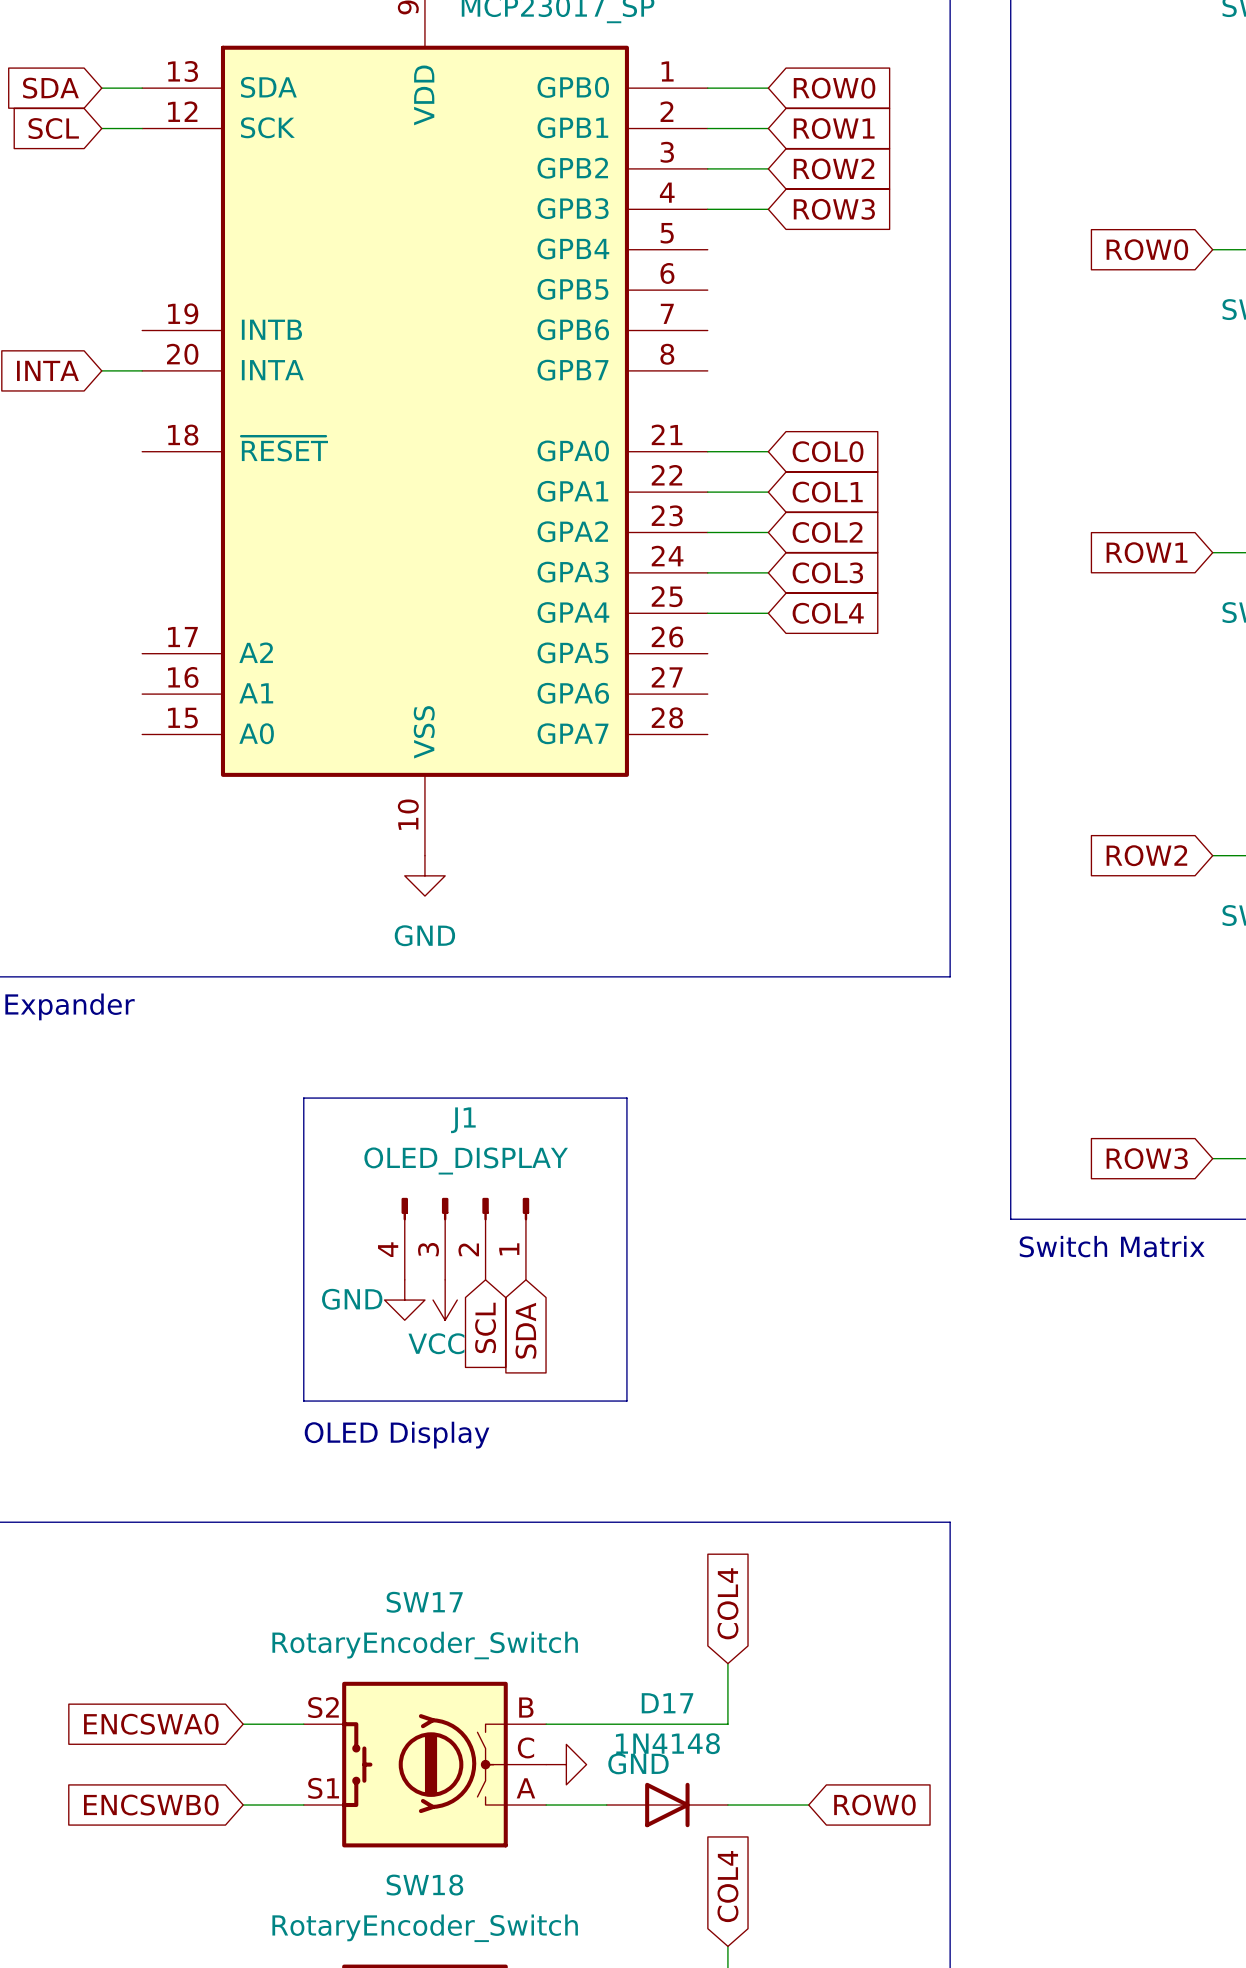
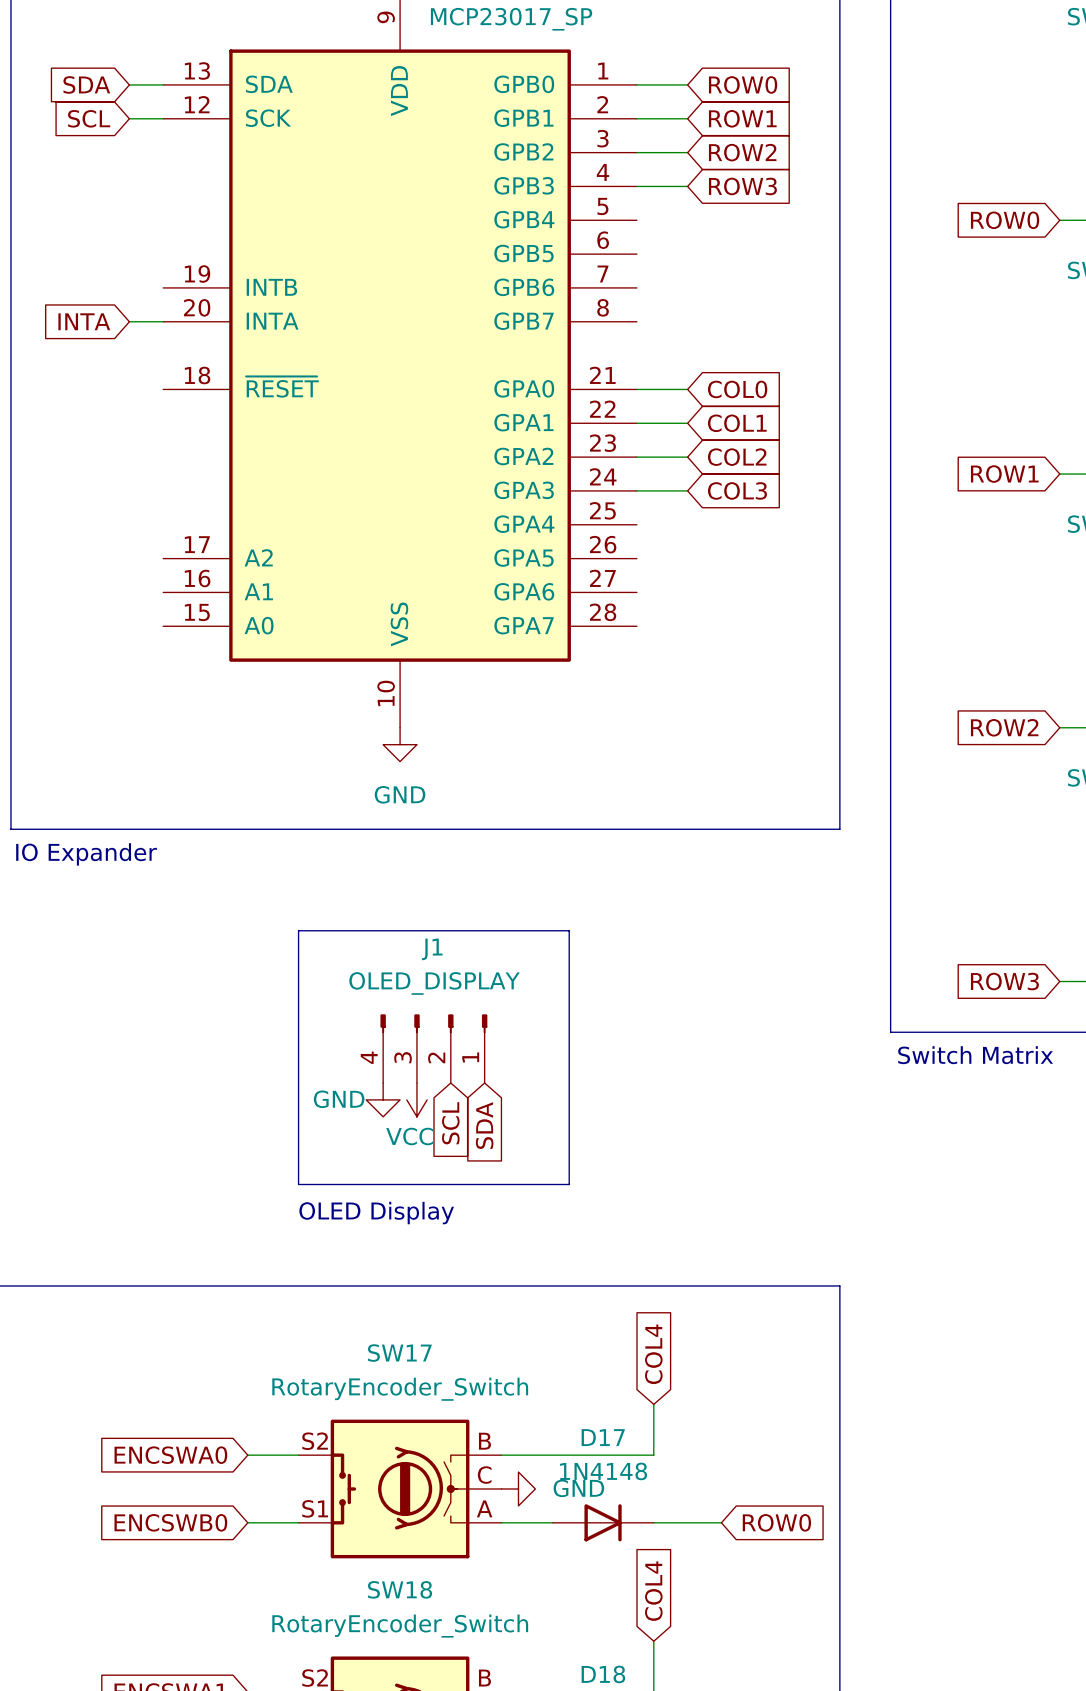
wire: (707, 613) (768, 613) -> none
global label: COL4 (828, 613) -> none

